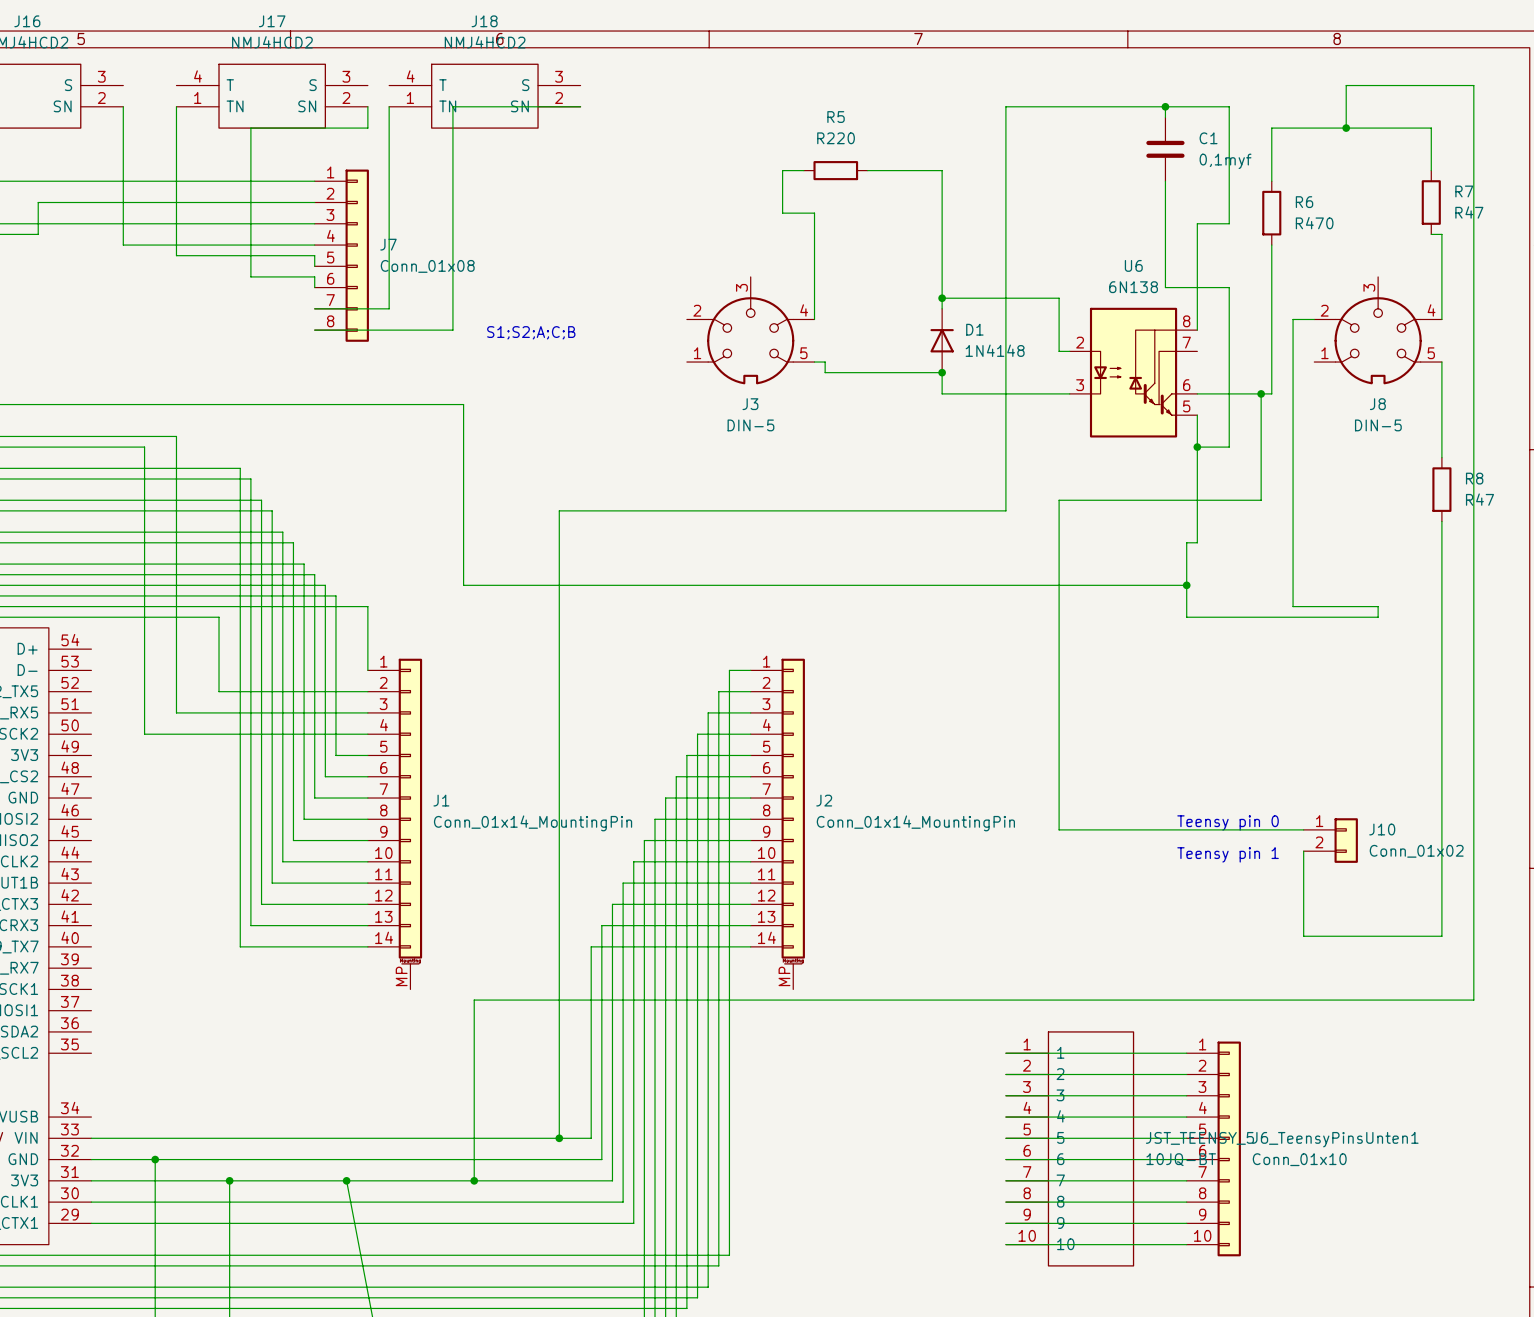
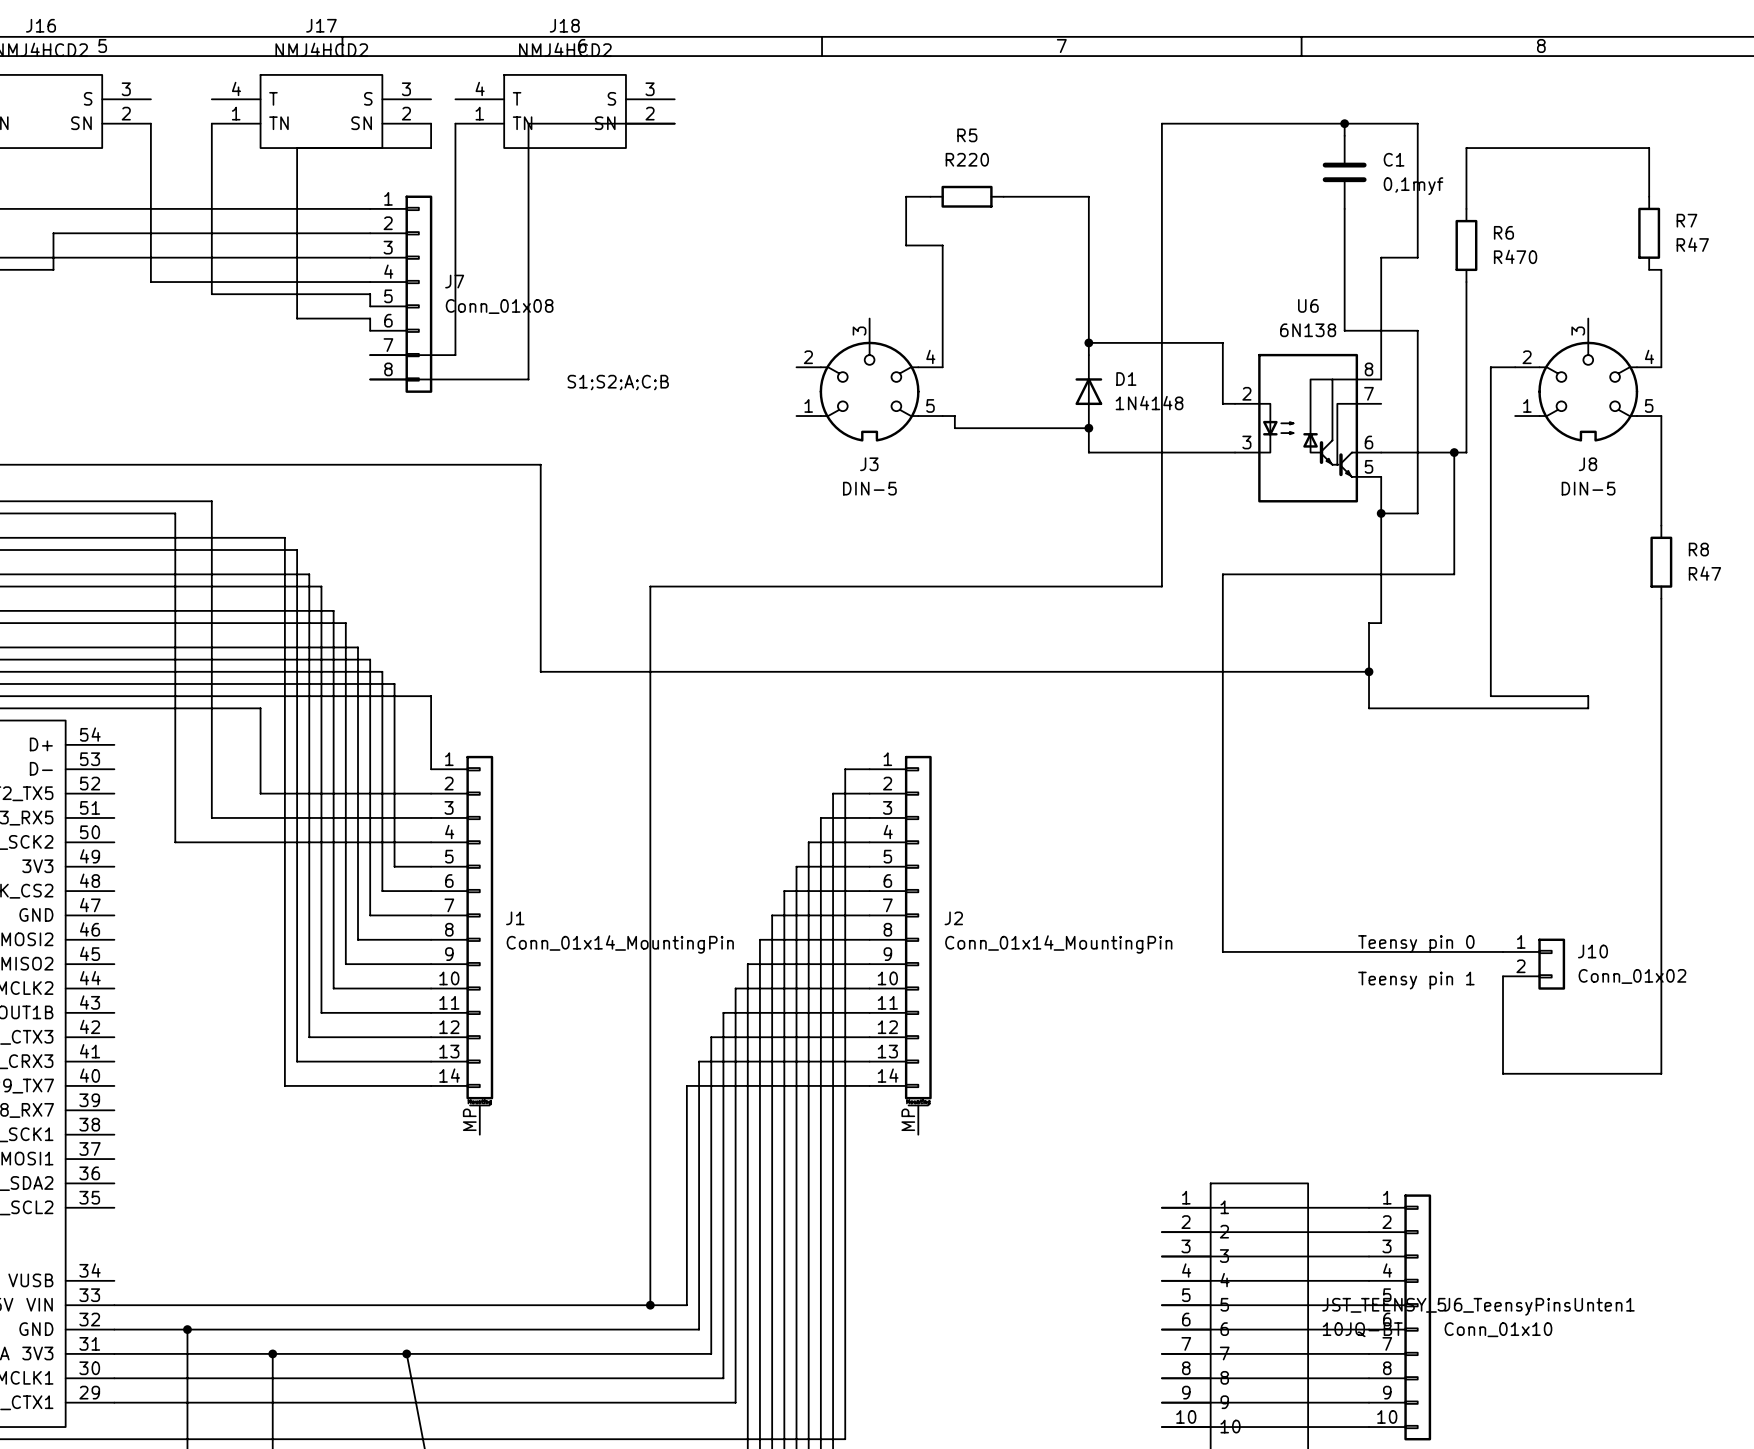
wire: (1346, 128) (1346, 85) (1473, 85) (1473, 1000) (474, 1000) (474, 1180) -> none
junction: (1346, 128) -> none
junction: (474, 1180) -> none

